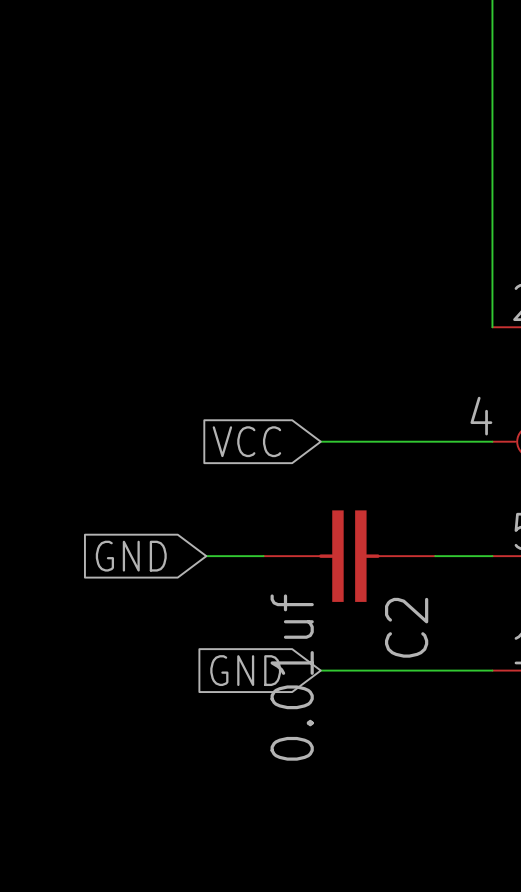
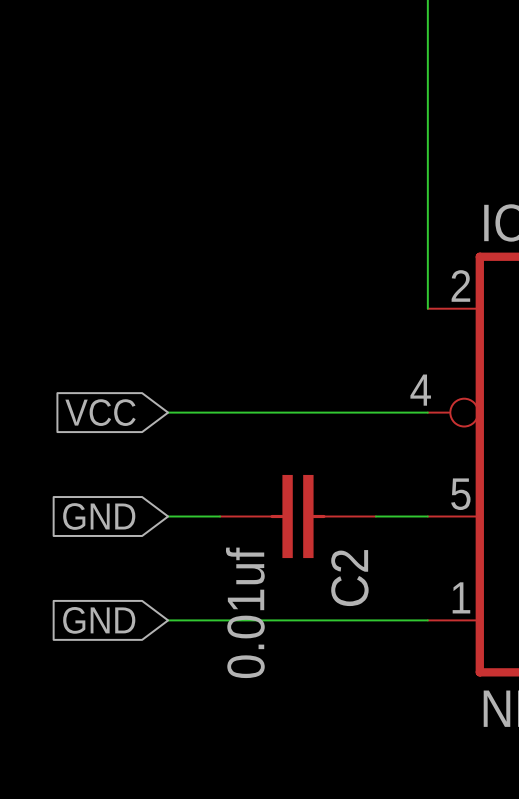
wire: none -> (168, 412) (272, 412)
global label position: VCC (246, 441) -> VCC (100, 412)
wire: none -> (168, 620) (272, 620)
global label position: GND (245, 670) -> GND (99, 620)

